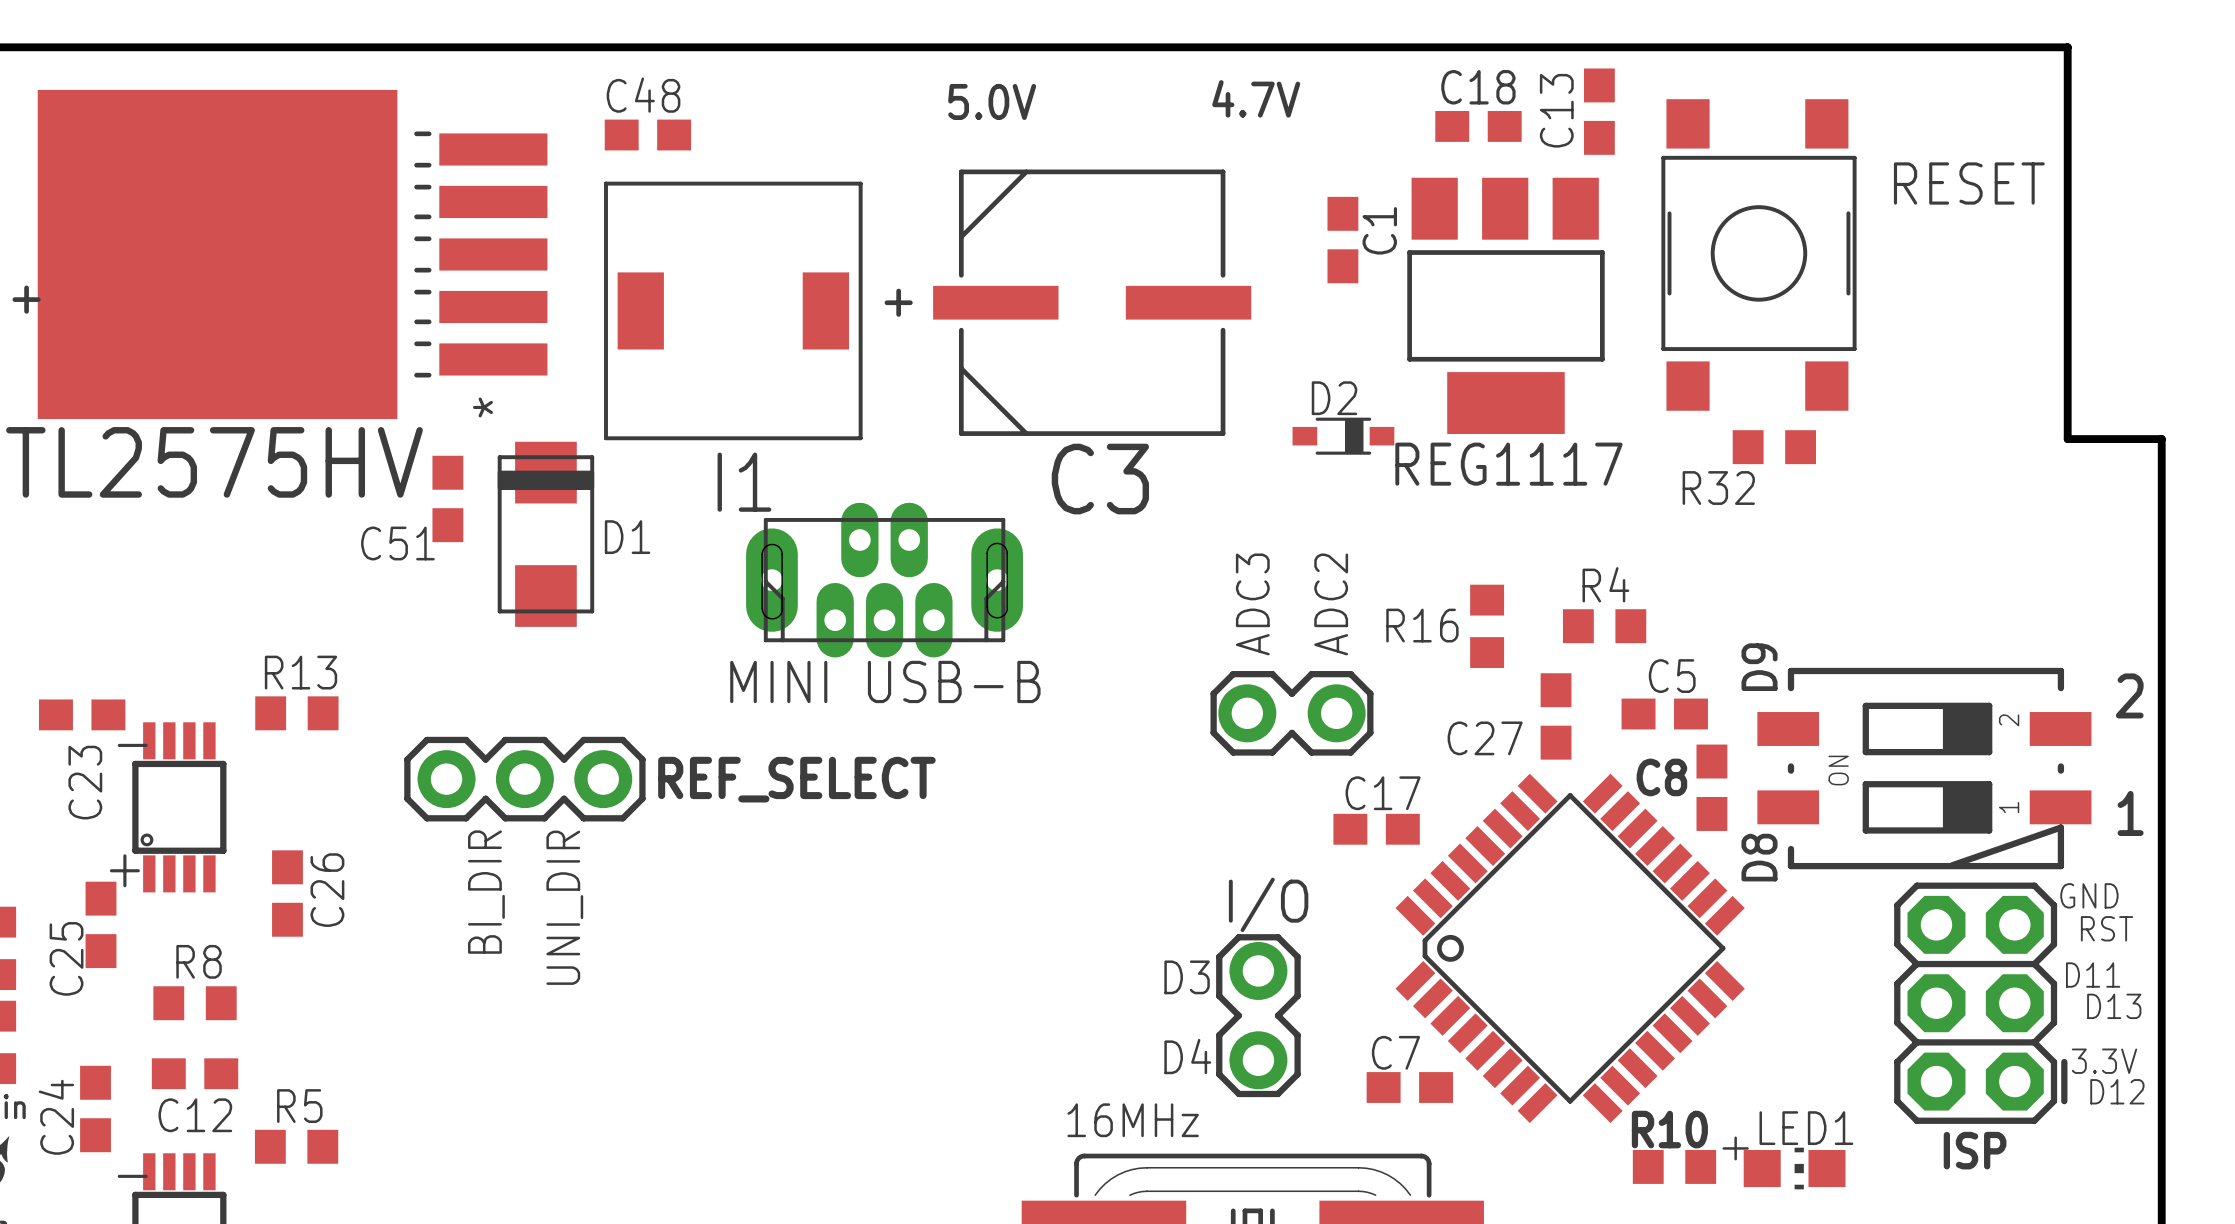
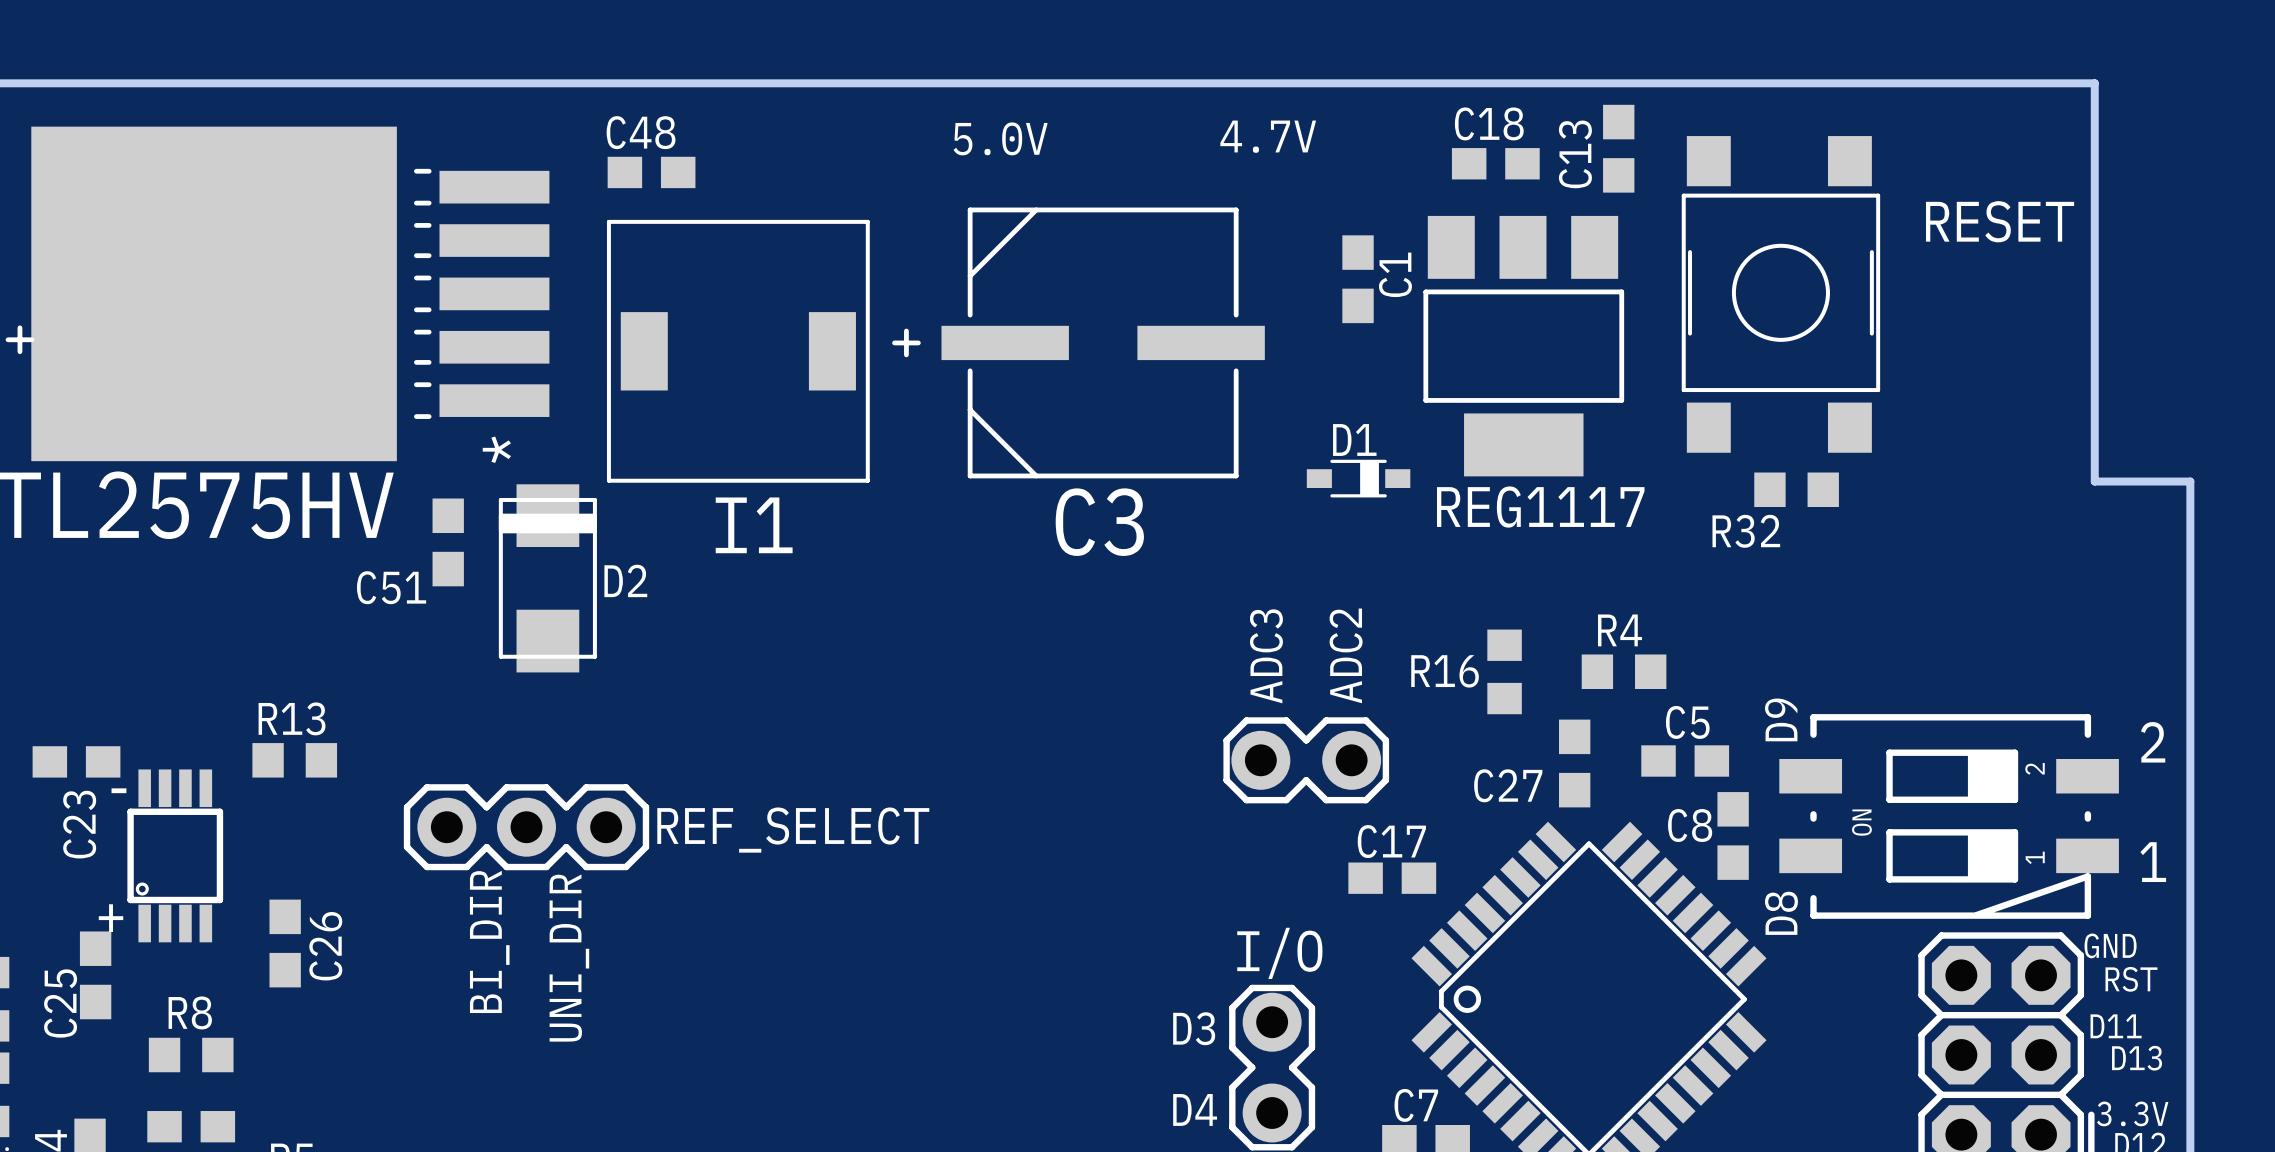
D2 name: D2 (1334, 398) -> D1 (1354, 439)
text: D1 (627, 537) -> D2 (625, 580)
part: (884, 580) -> none
text: MINI USB-B (885, 681) -> none

